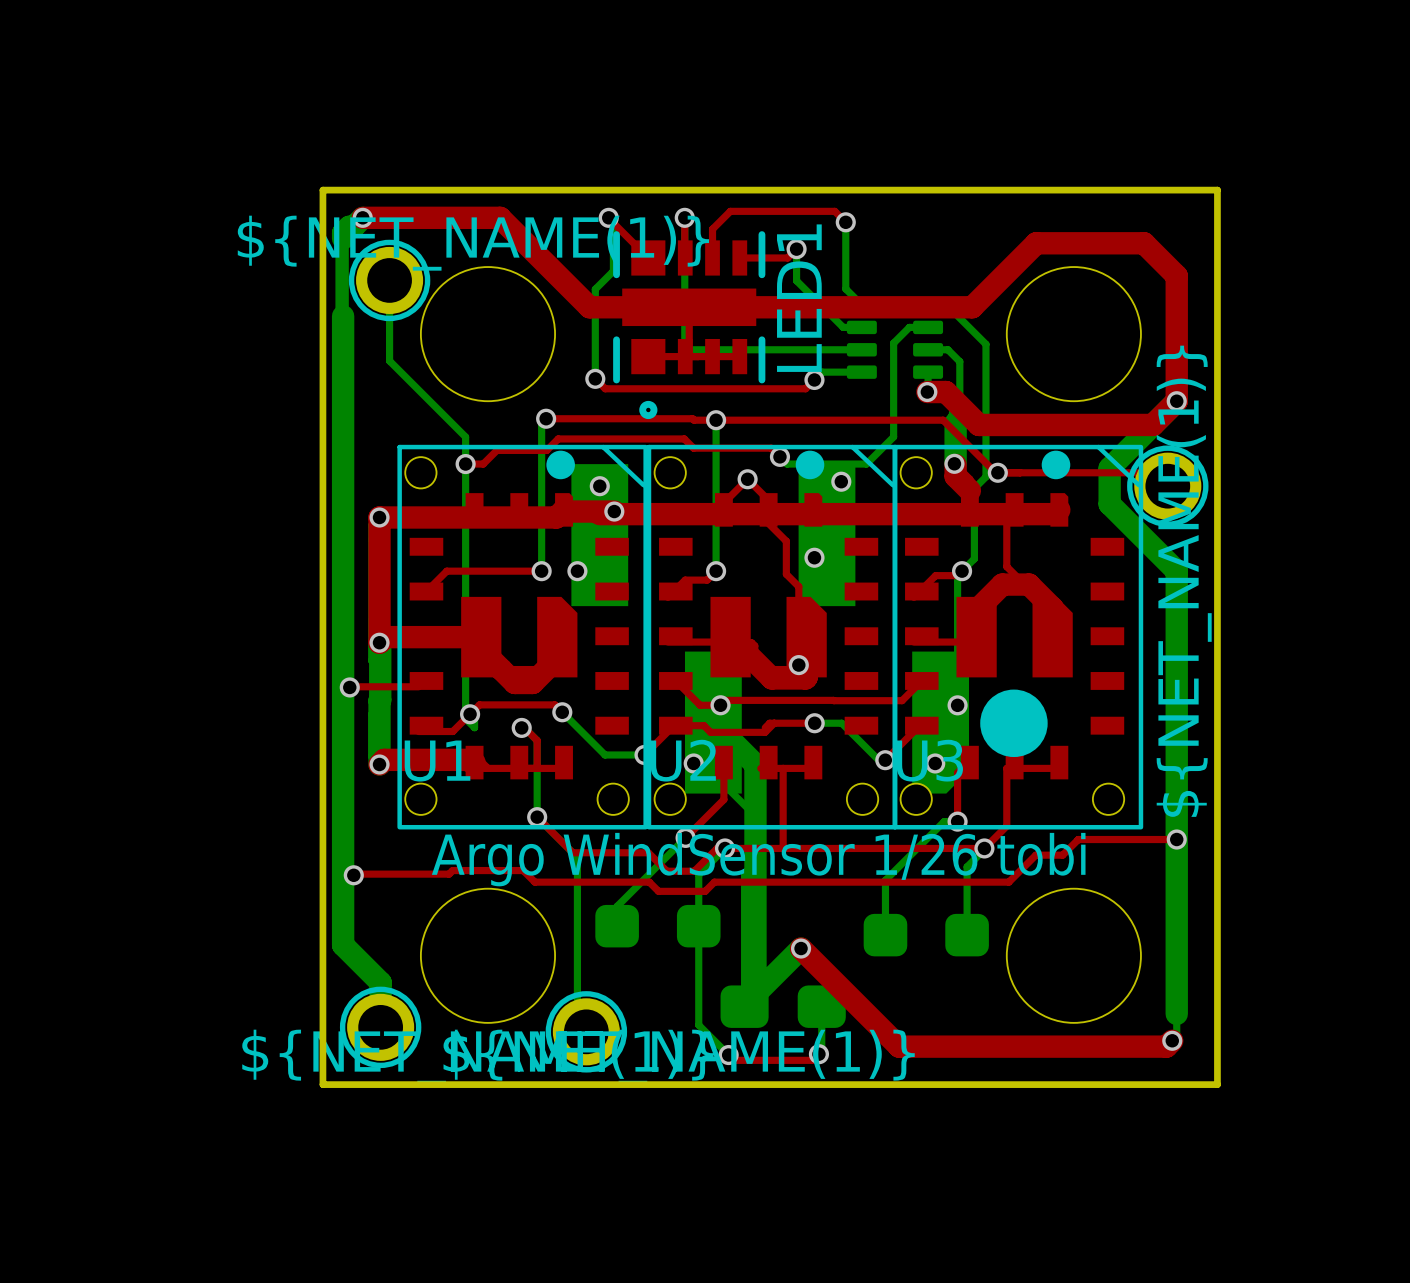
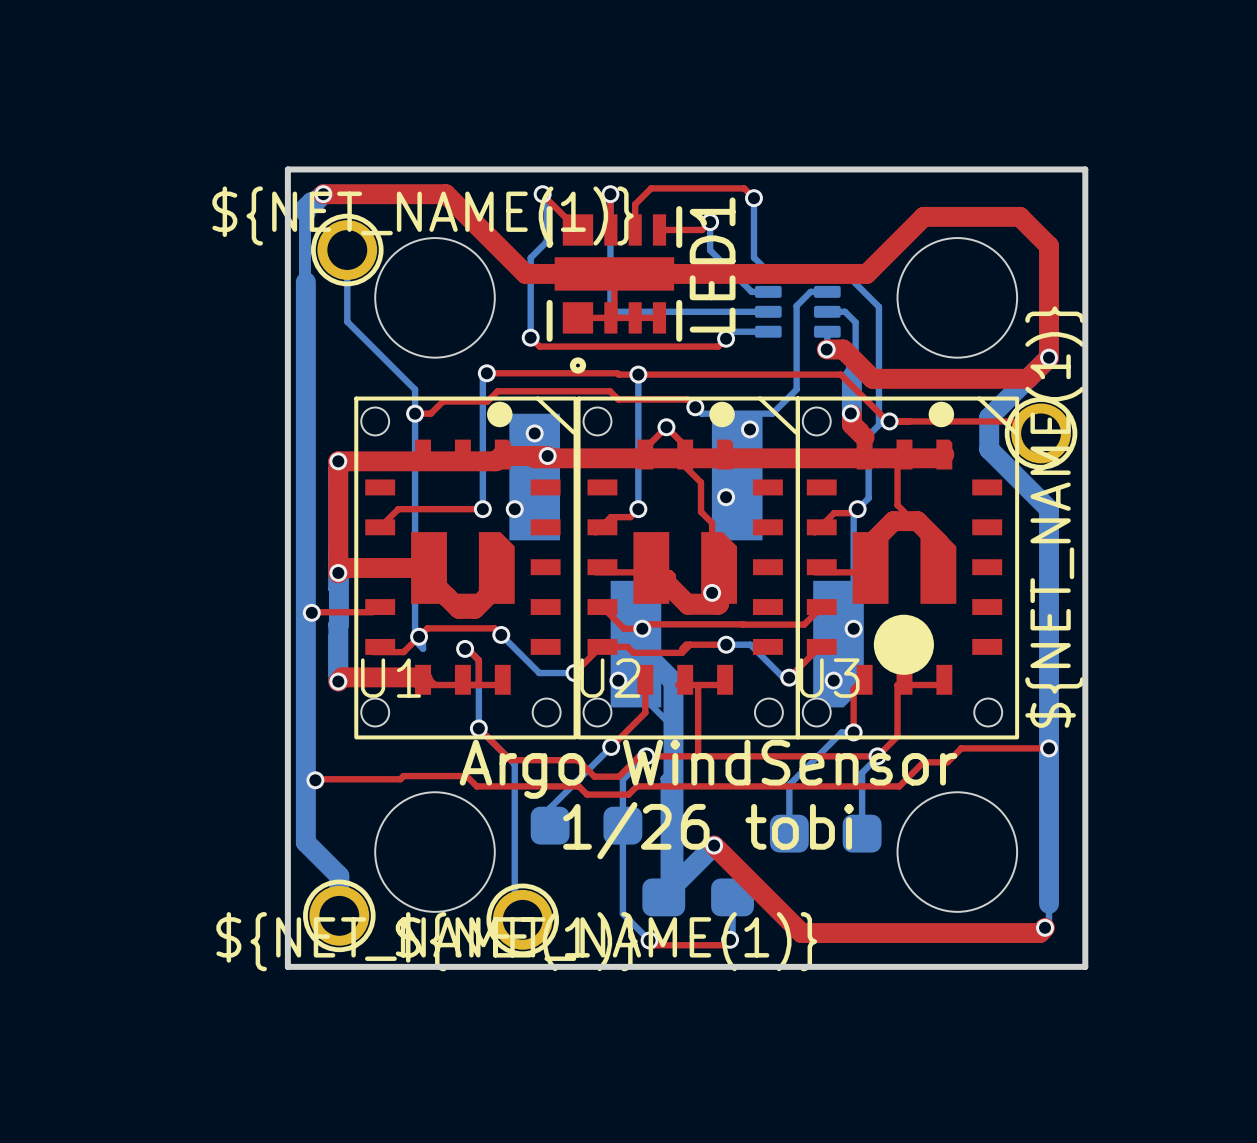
text: Argo WindSensor 1/26 tobi (758, 859) -> Argo WindSensor (708, 769)
text: none -> 1/26 tobi (708, 830)

